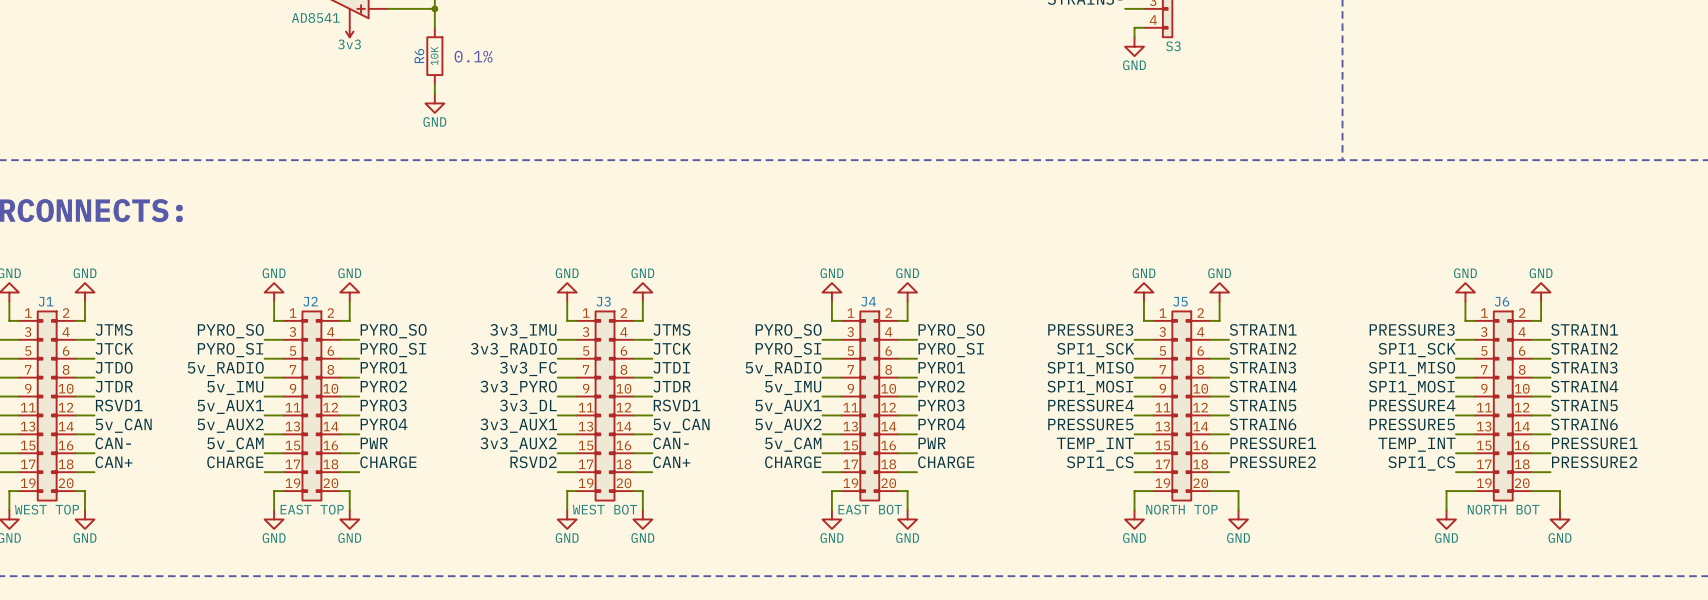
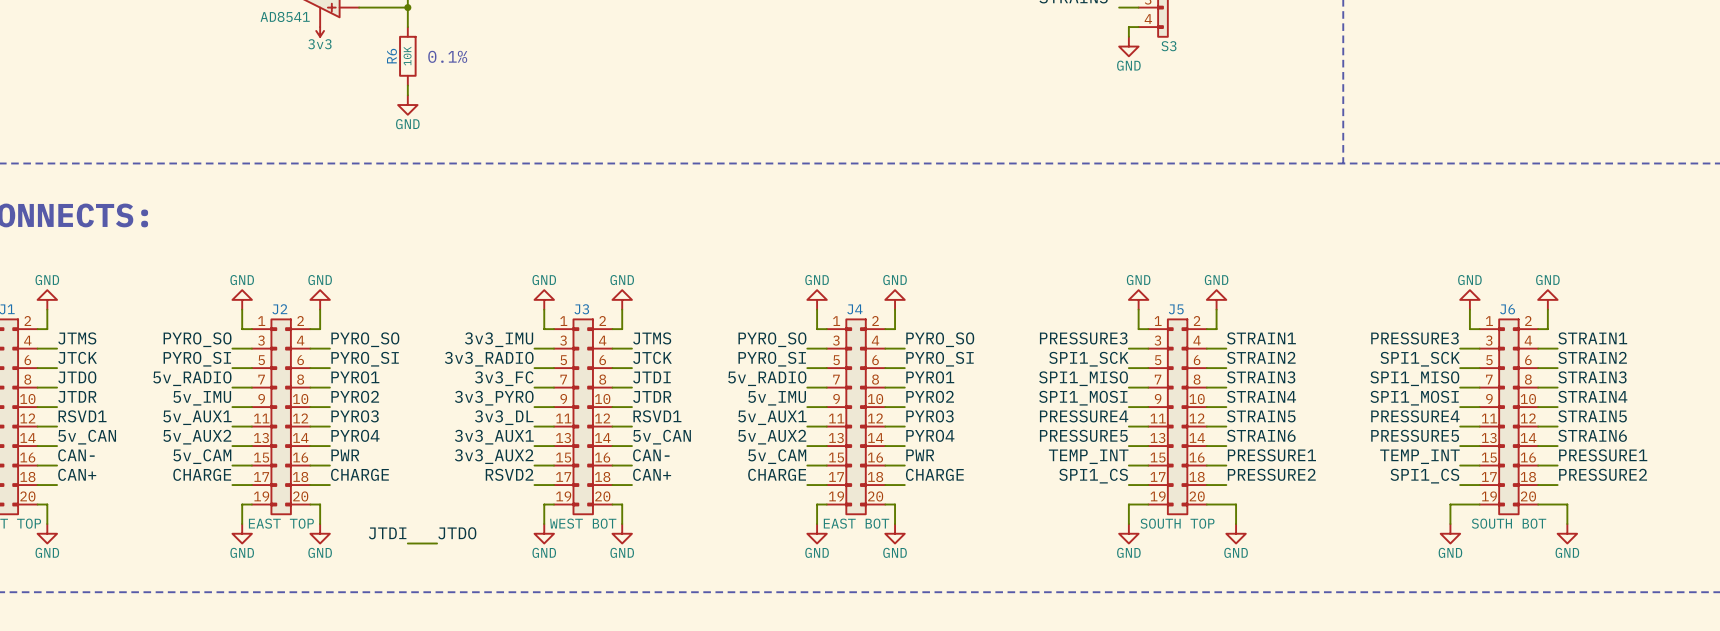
J5 value: NORTH TOP (1181, 509) -> SOUTH TOP (1177, 523)
J6 value: NORTH BOT (1503, 509) -> SOUTH BOT (1509, 523)
label: none -> JTDI (387, 533)
label: none -> JTDO (457, 533)
wire: none -> (407, 543) (437, 543)

